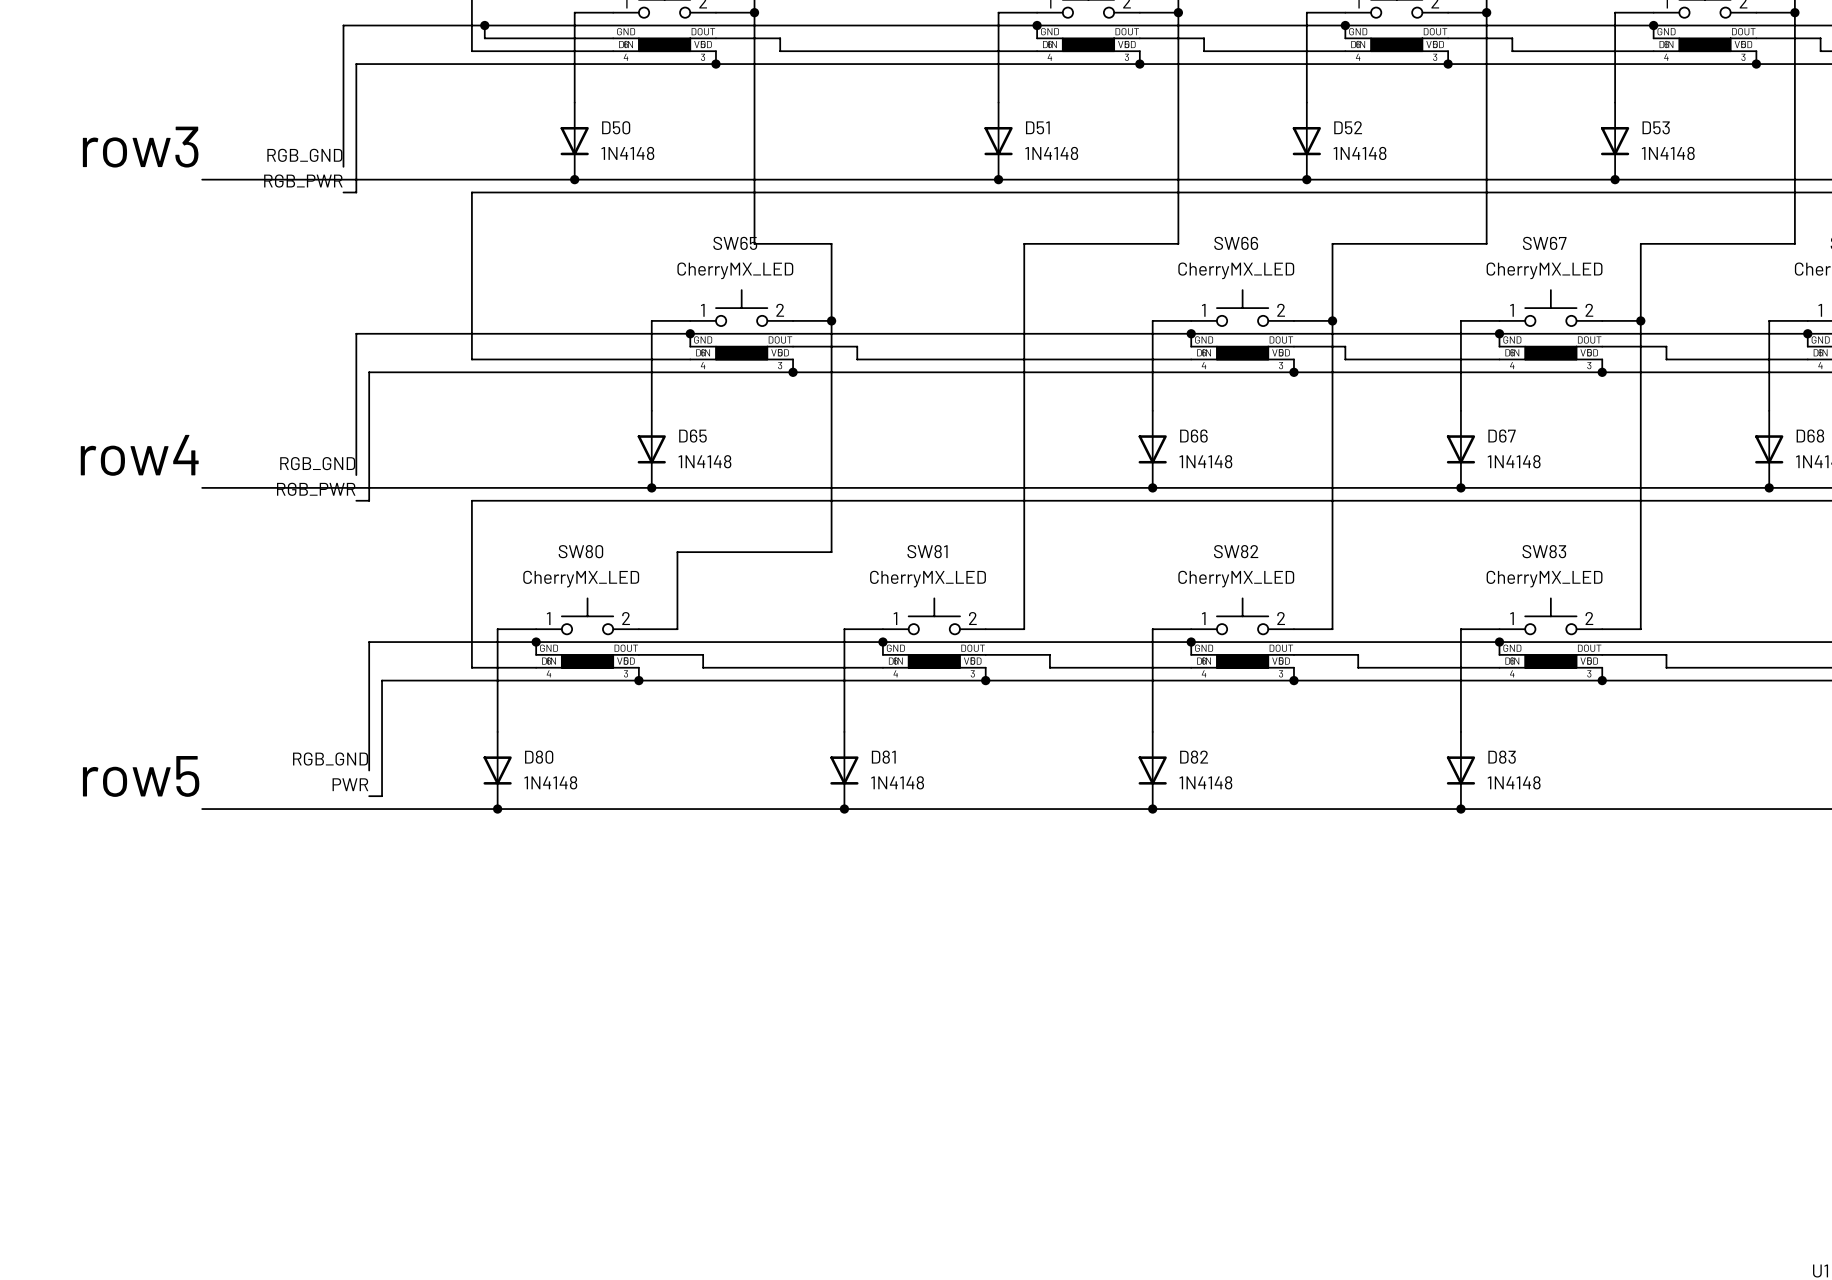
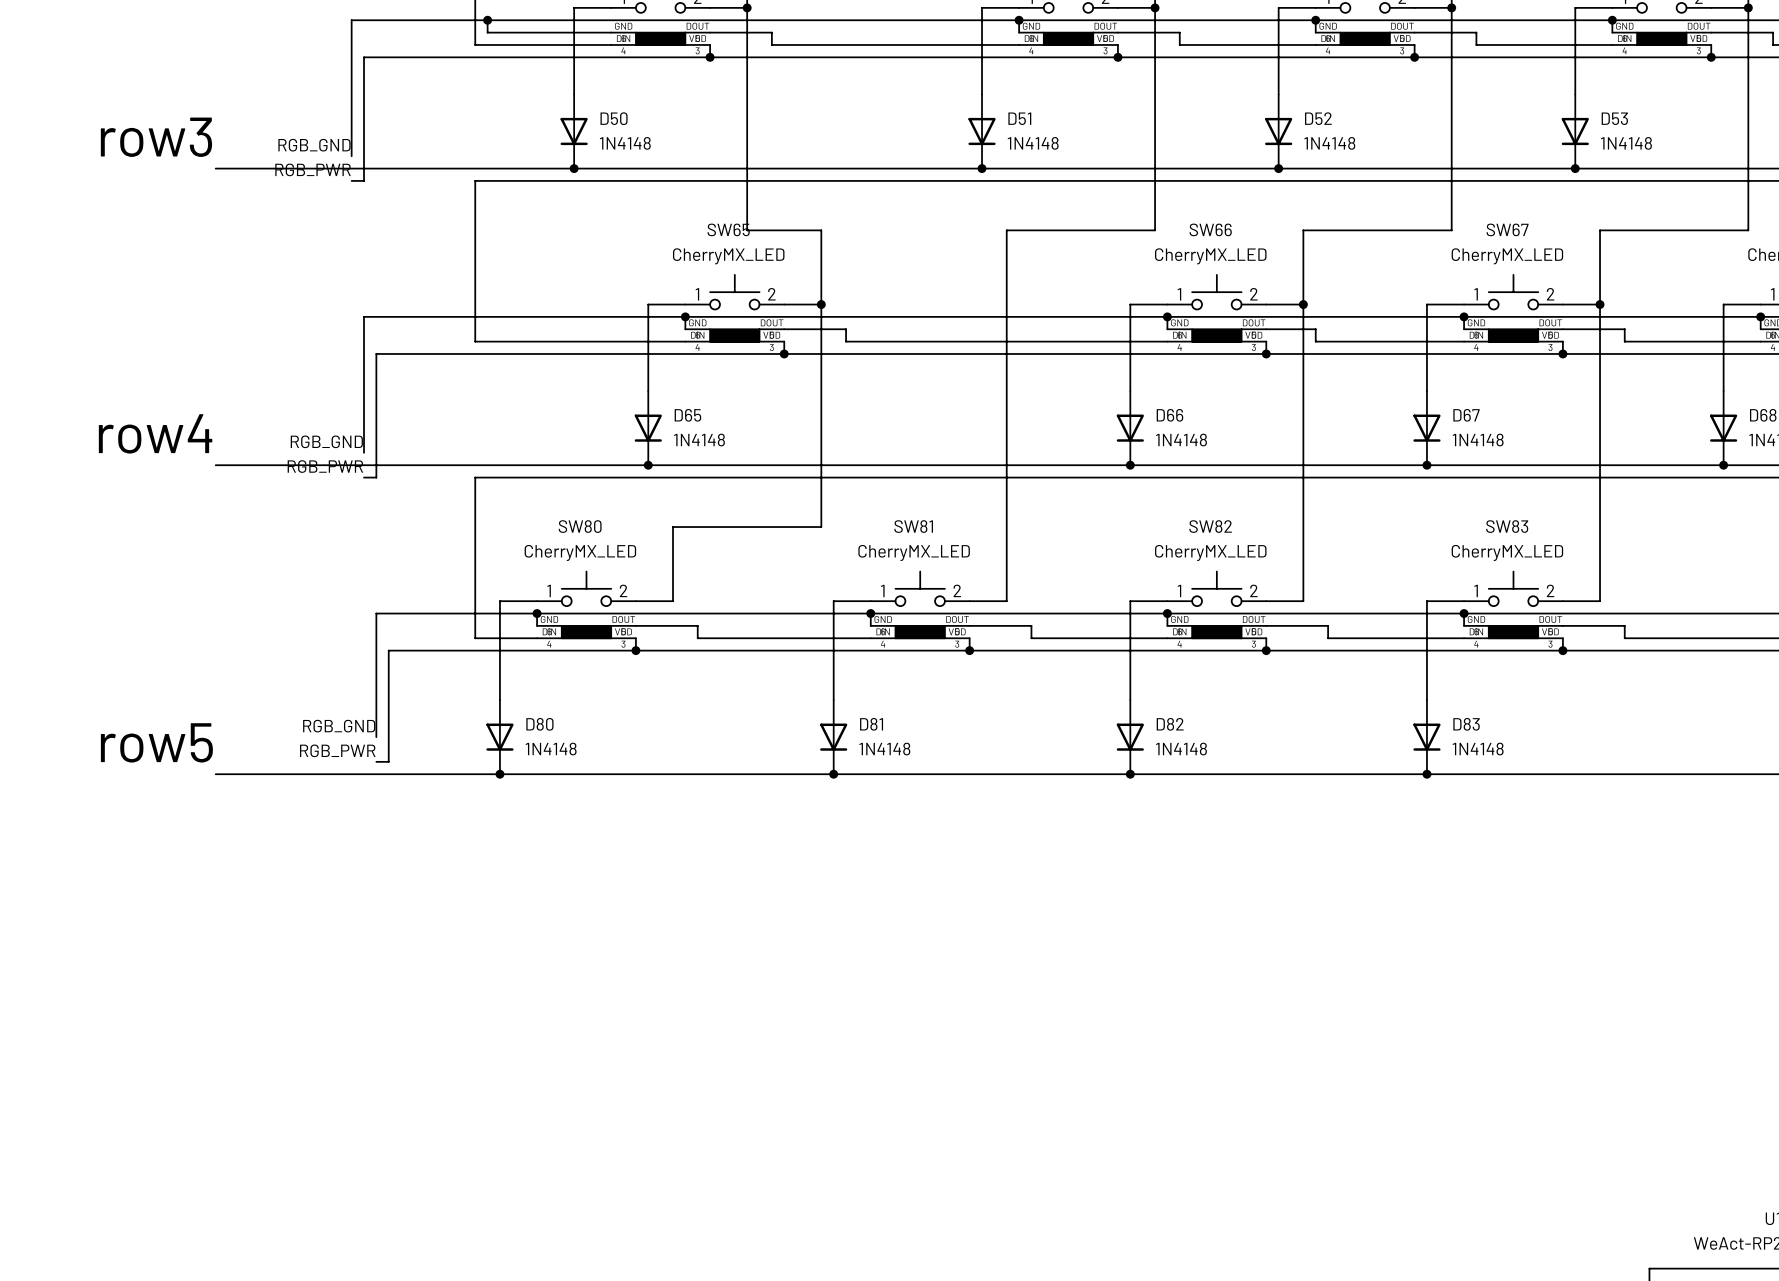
label: PWR (350, 784) -> RGB_PWR (337, 750)

